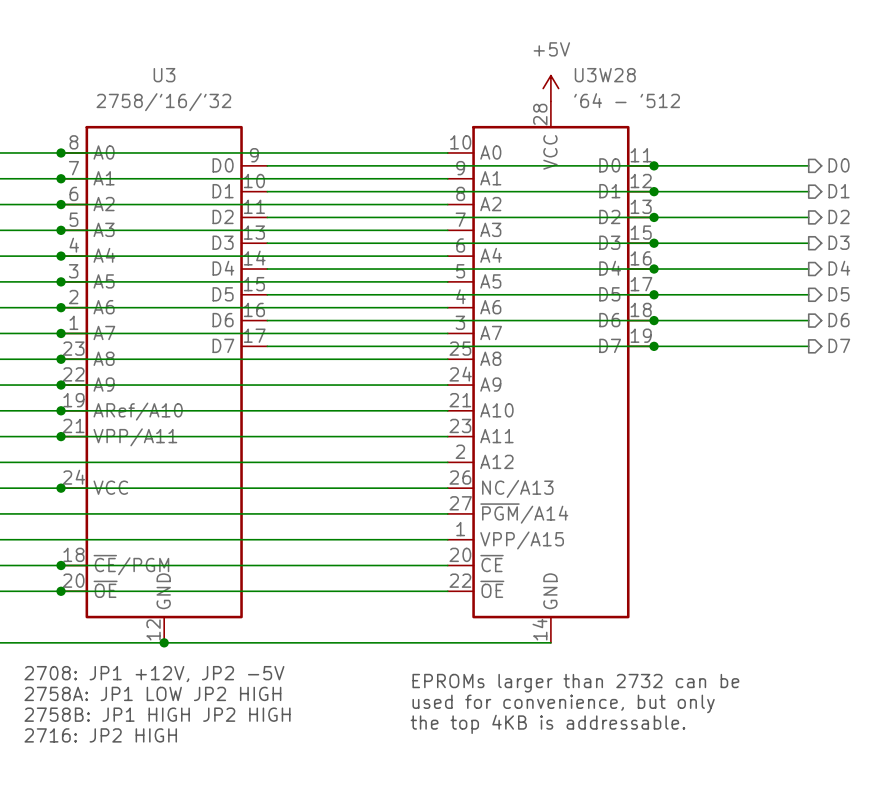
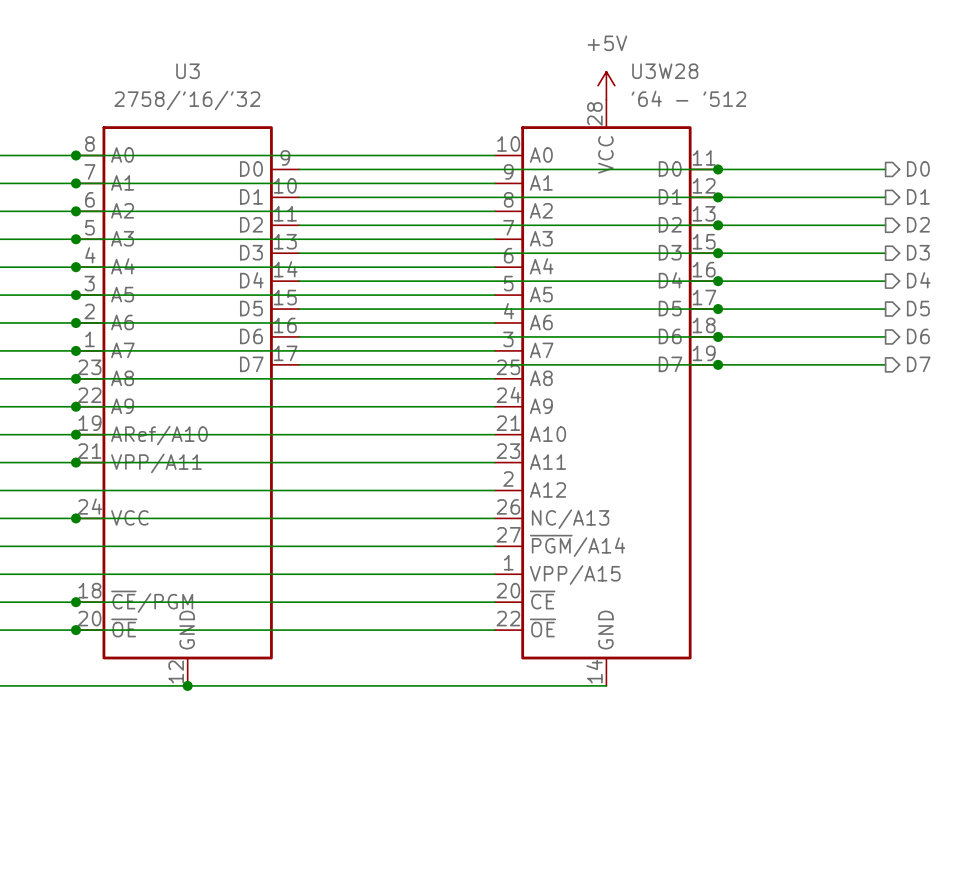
text: 2708: JP1 +12V, JP2 -5V (154, 674) -> none
text: EPROMs larger than 2732 can be (575, 683) -> none
text: 2758A: JP1 LOW JP2 HIGH (152, 693) -> none
text: used for convenience, but only (563, 703) -> none
text: 2758B: JP1 HIGH JP2 HIGH (157, 714) -> none
text: the top 4KB is addressable. (547, 724) -> none
text: 2716: JP2 HIGH (100, 735) -> none

